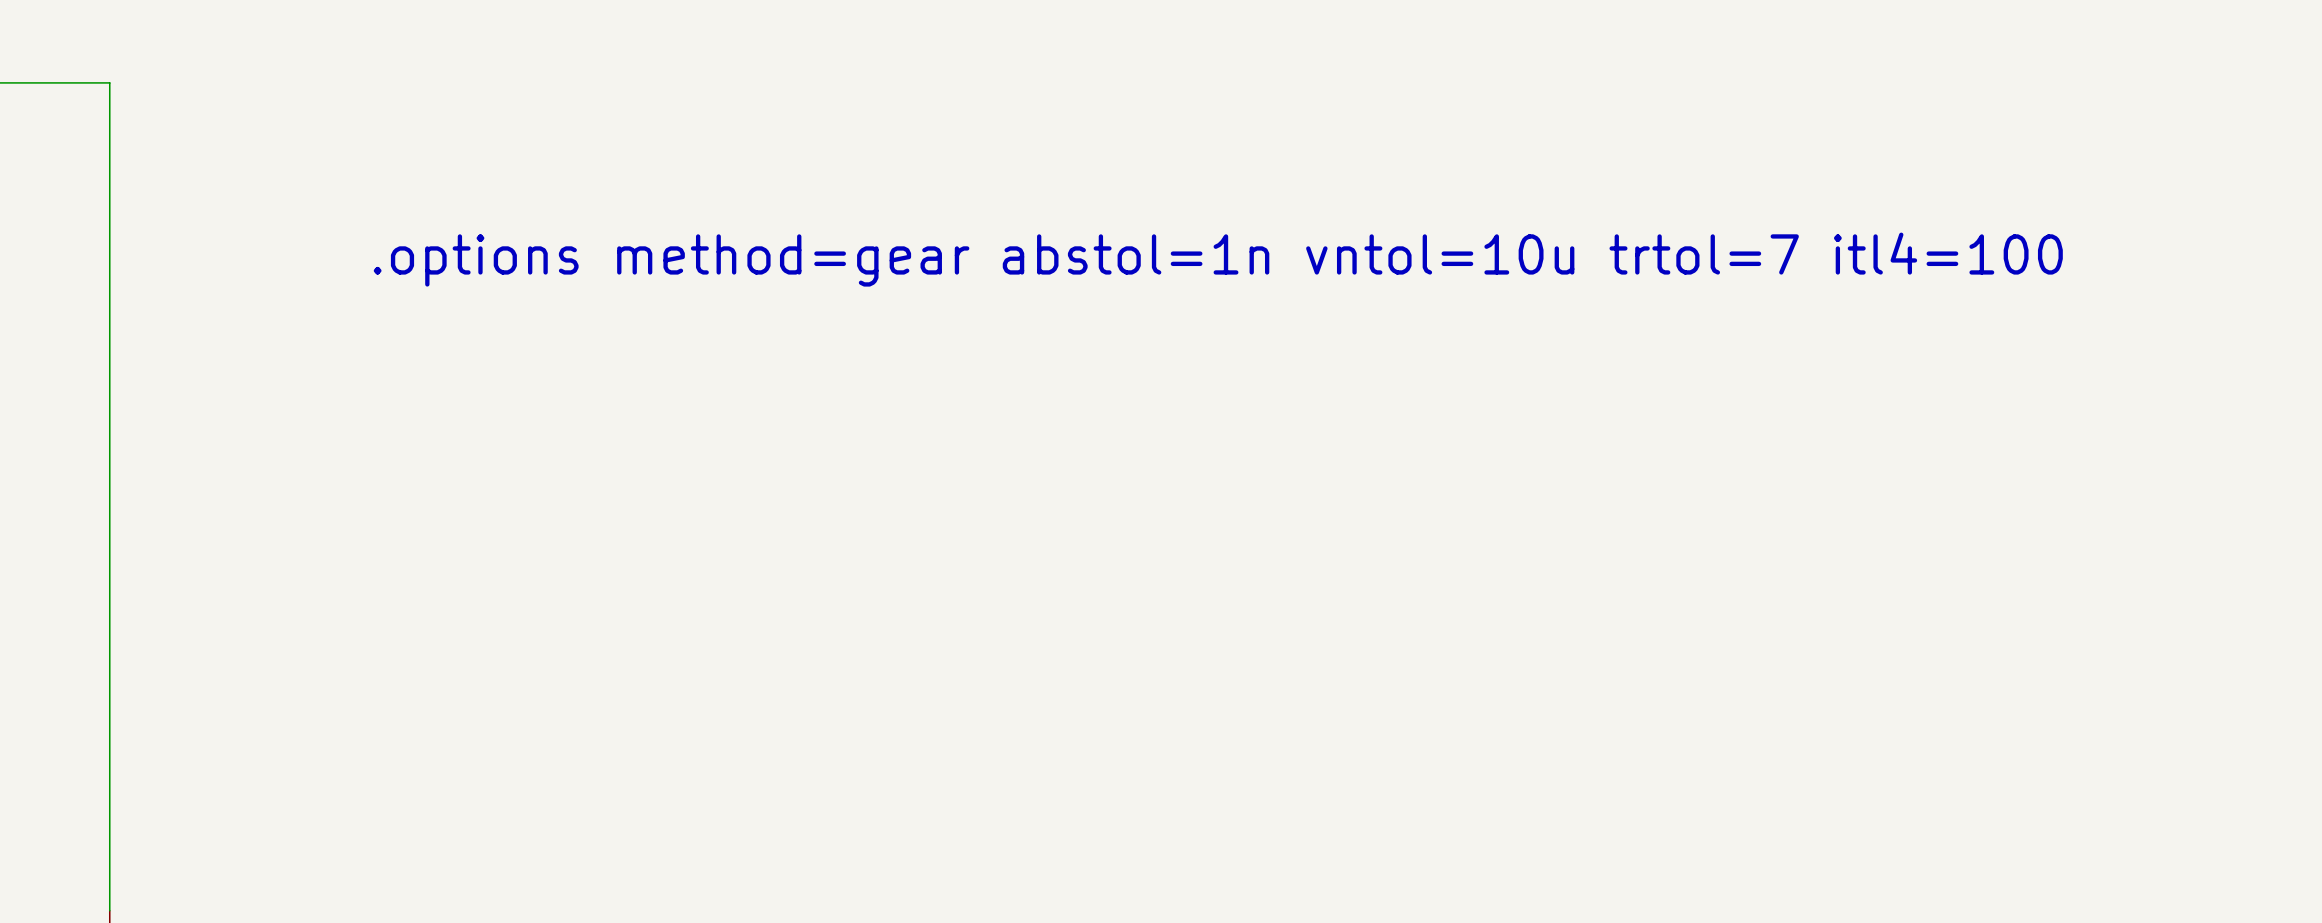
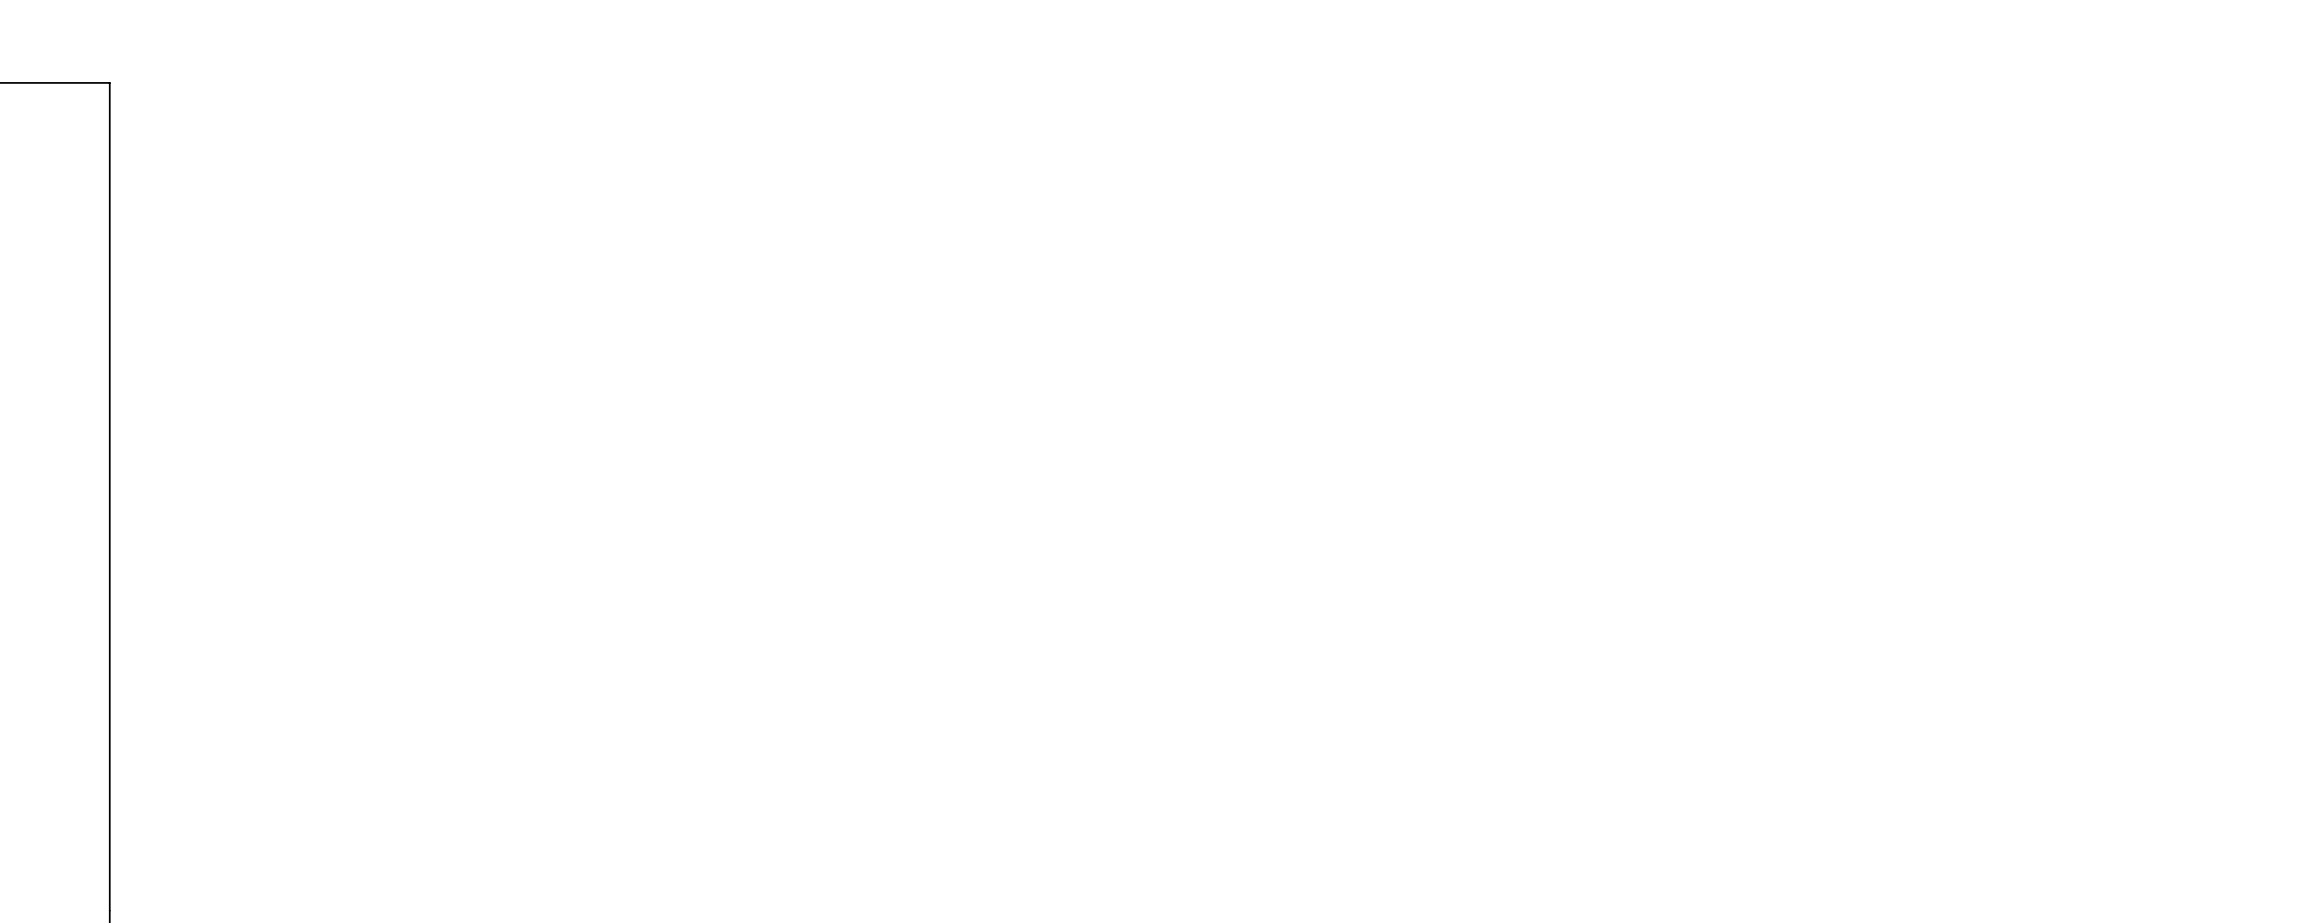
text: .options method=gear abstol=1n vntol=10u trtol=7 itl4=100 (1218, 259) -> none

